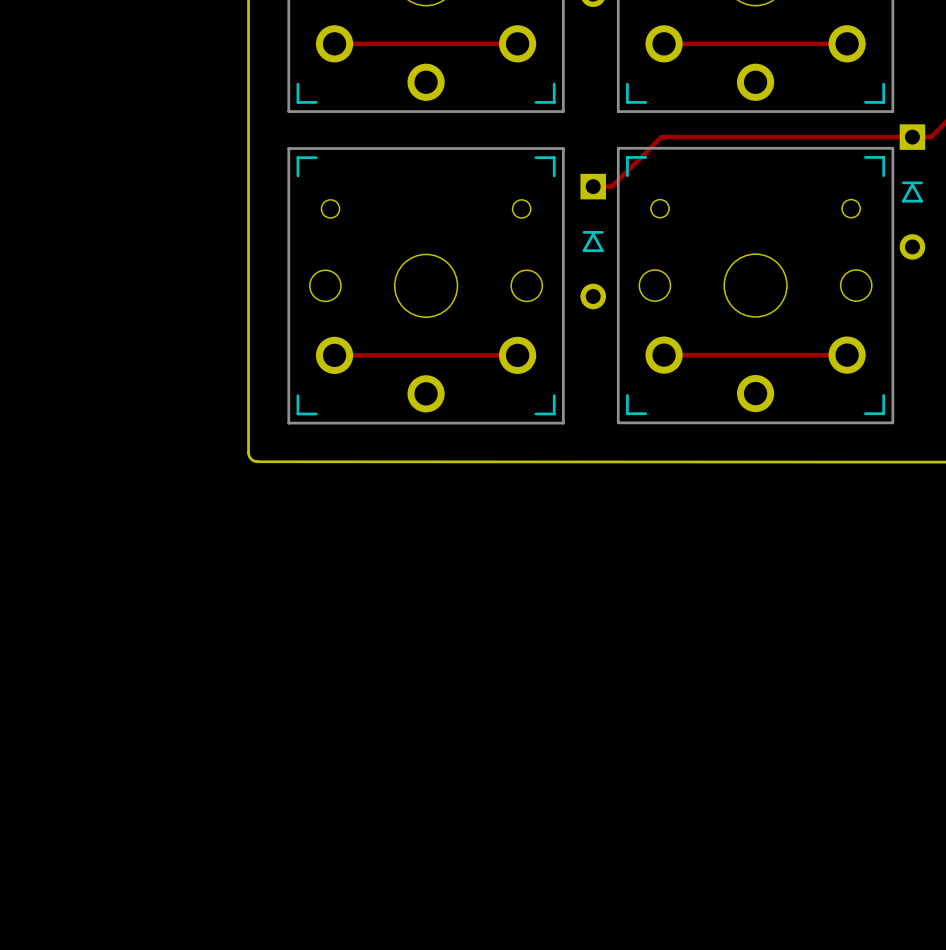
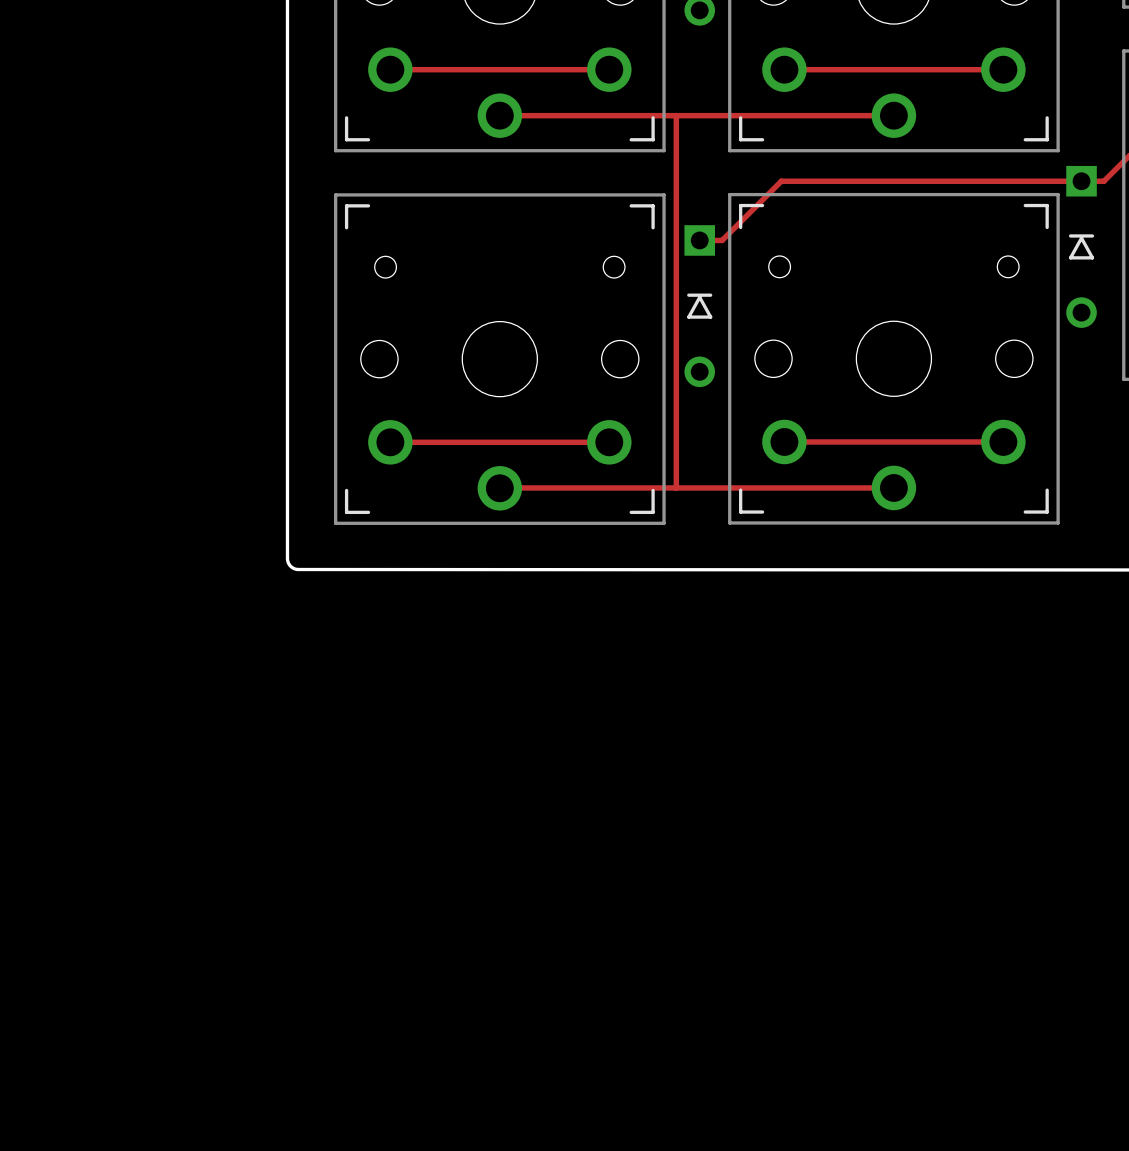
track: none -> (499, 115) (893, 115)
track: none -> (676, 115) (676, 487)
track: none -> (893, 487) (499, 488)

